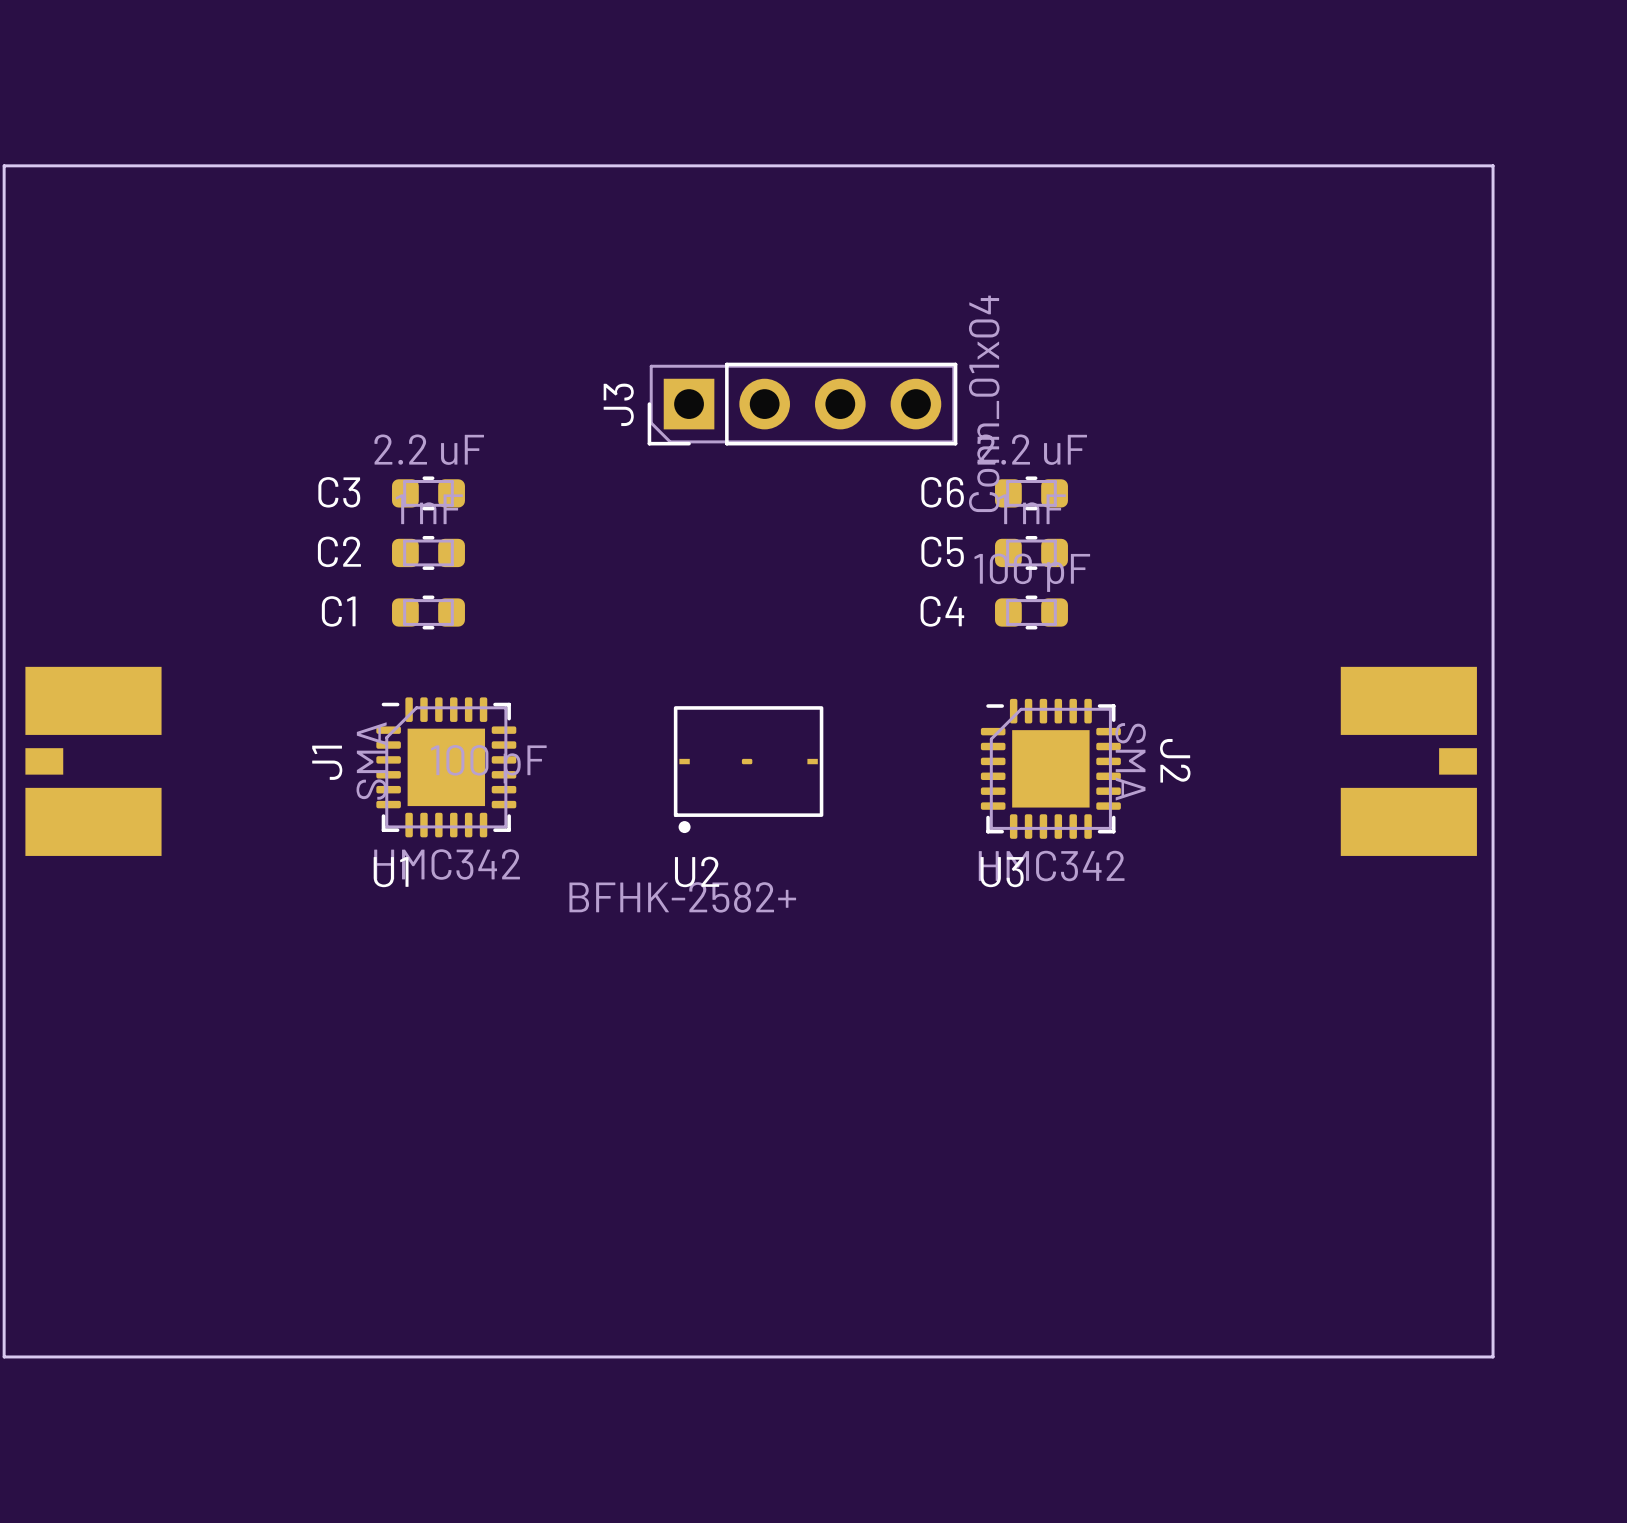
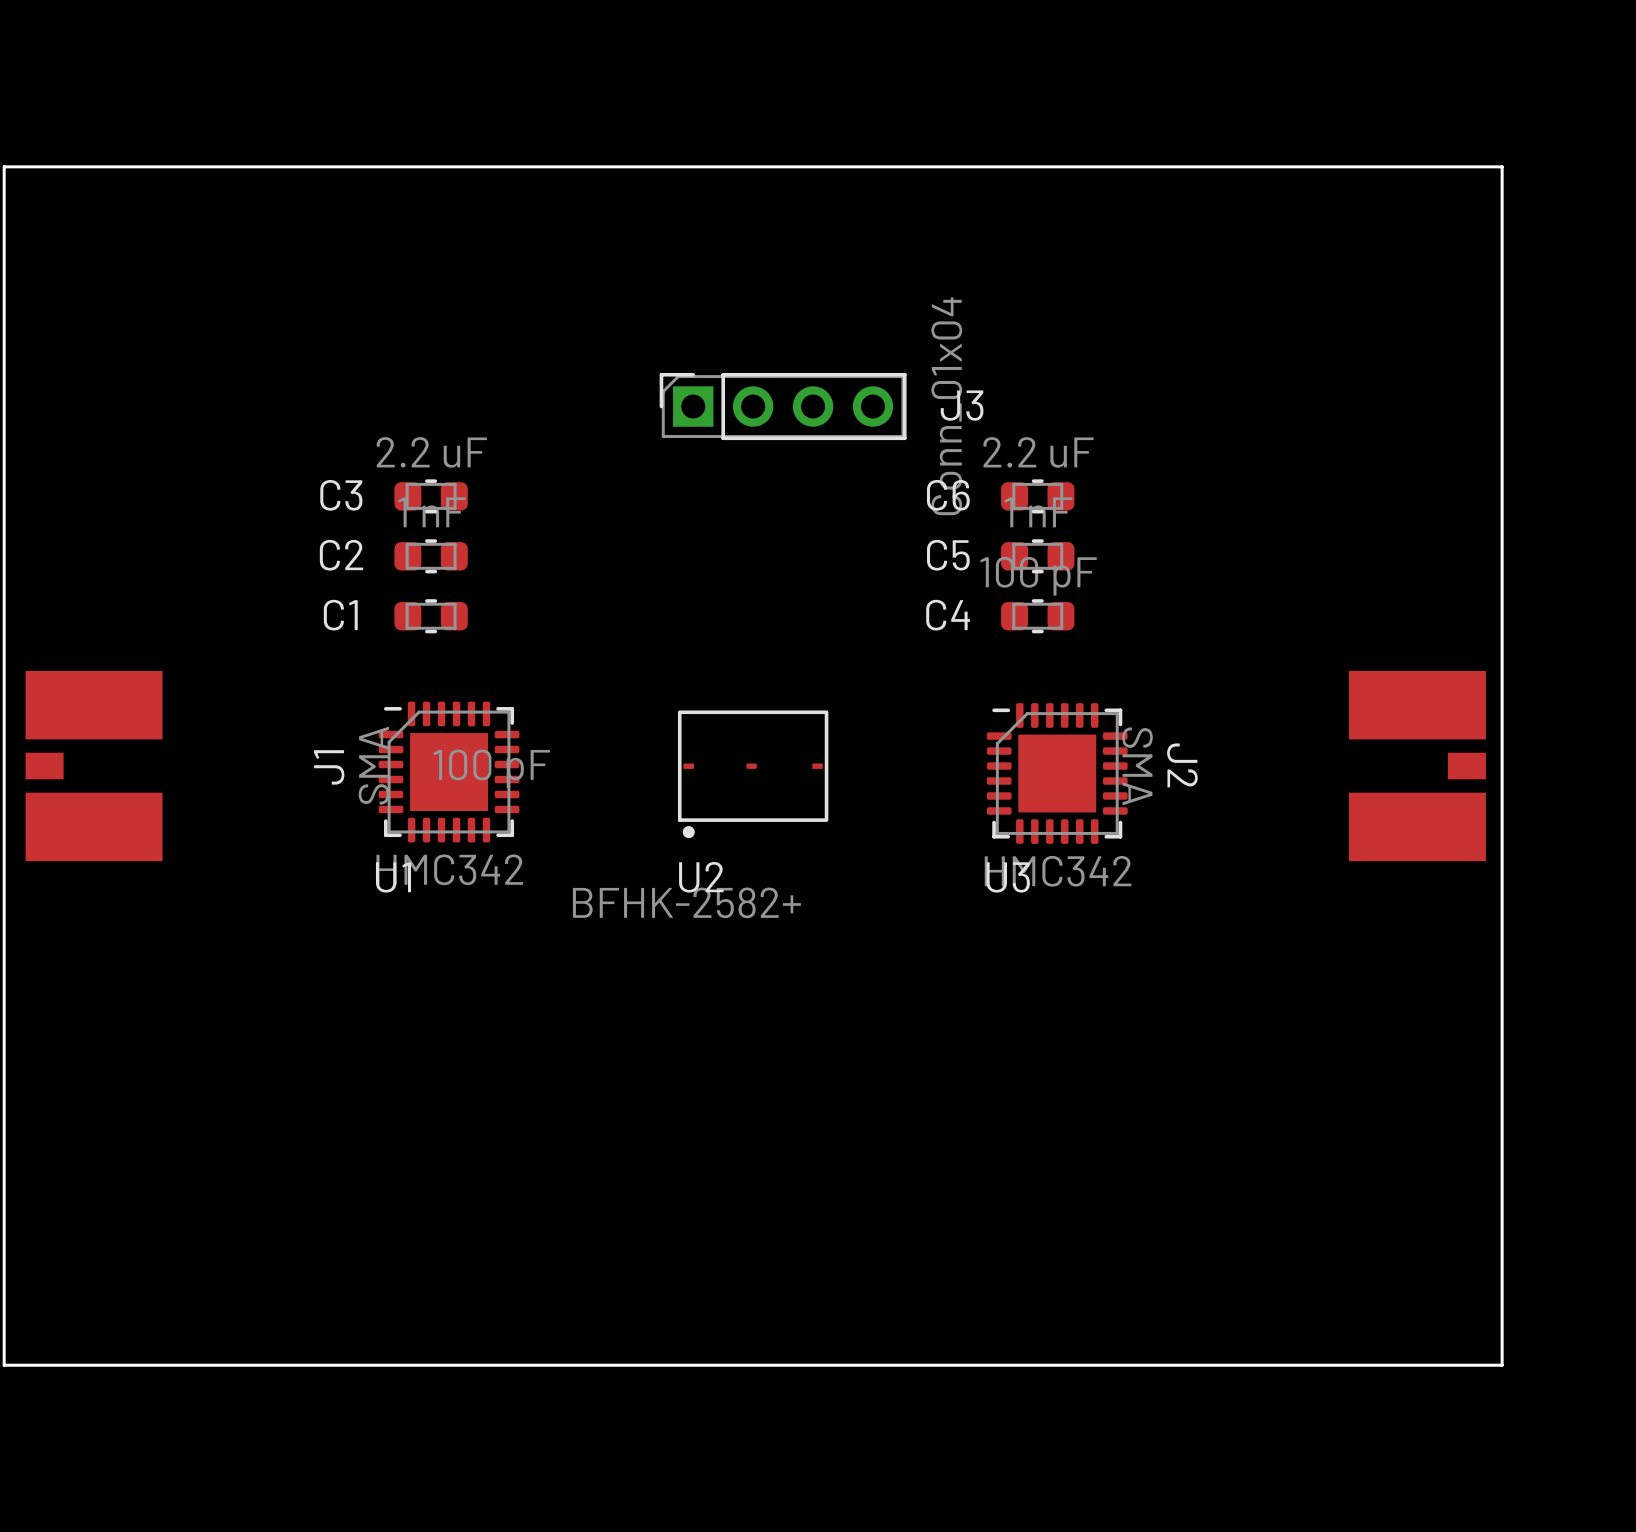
J3 footprint: [647, 362, 958, 446] -> [659, 372, 907, 441]
J3 name position: J3 (618, 404) -> J3 (962, 405)

